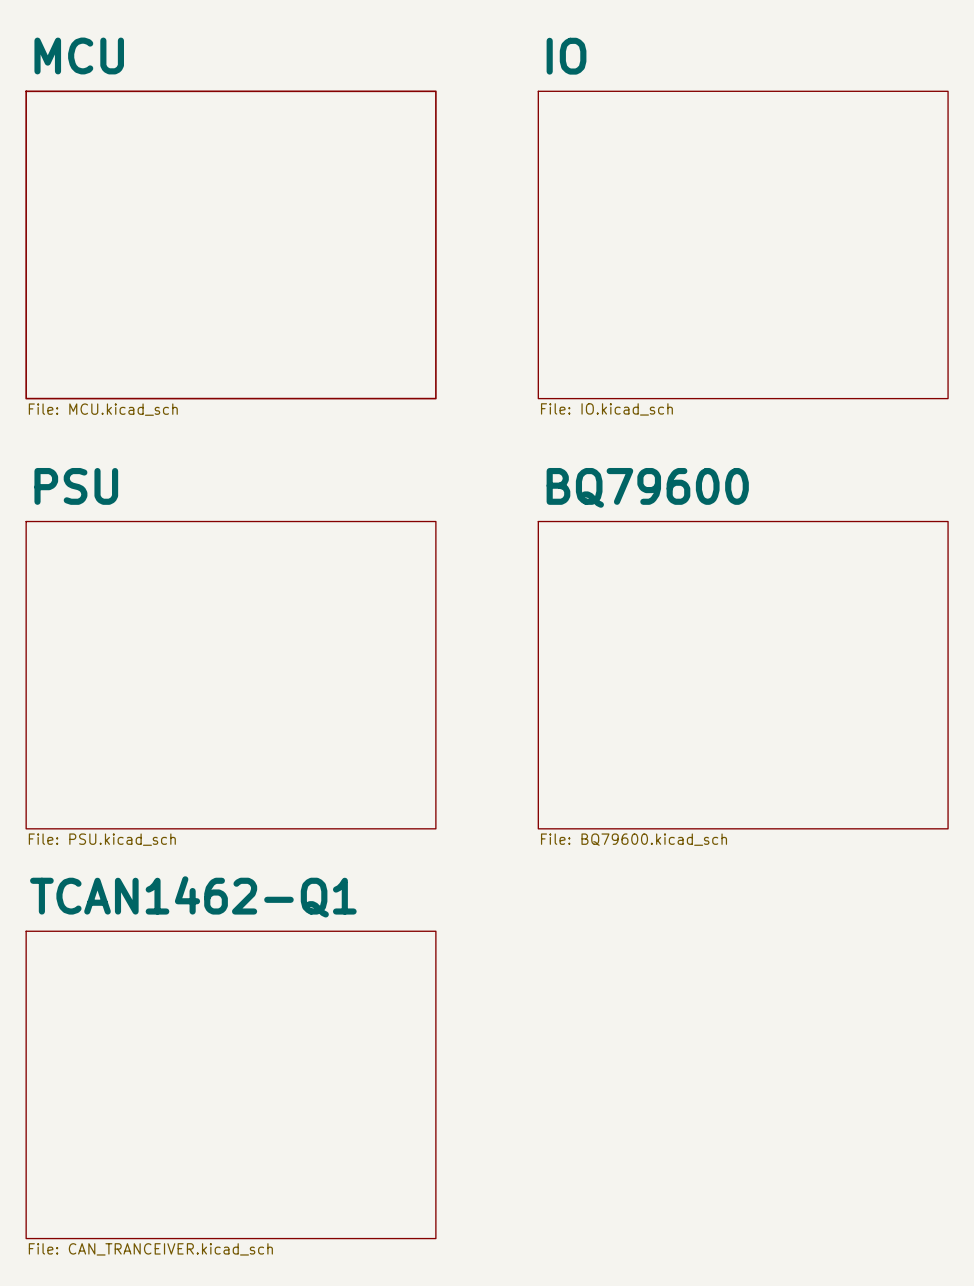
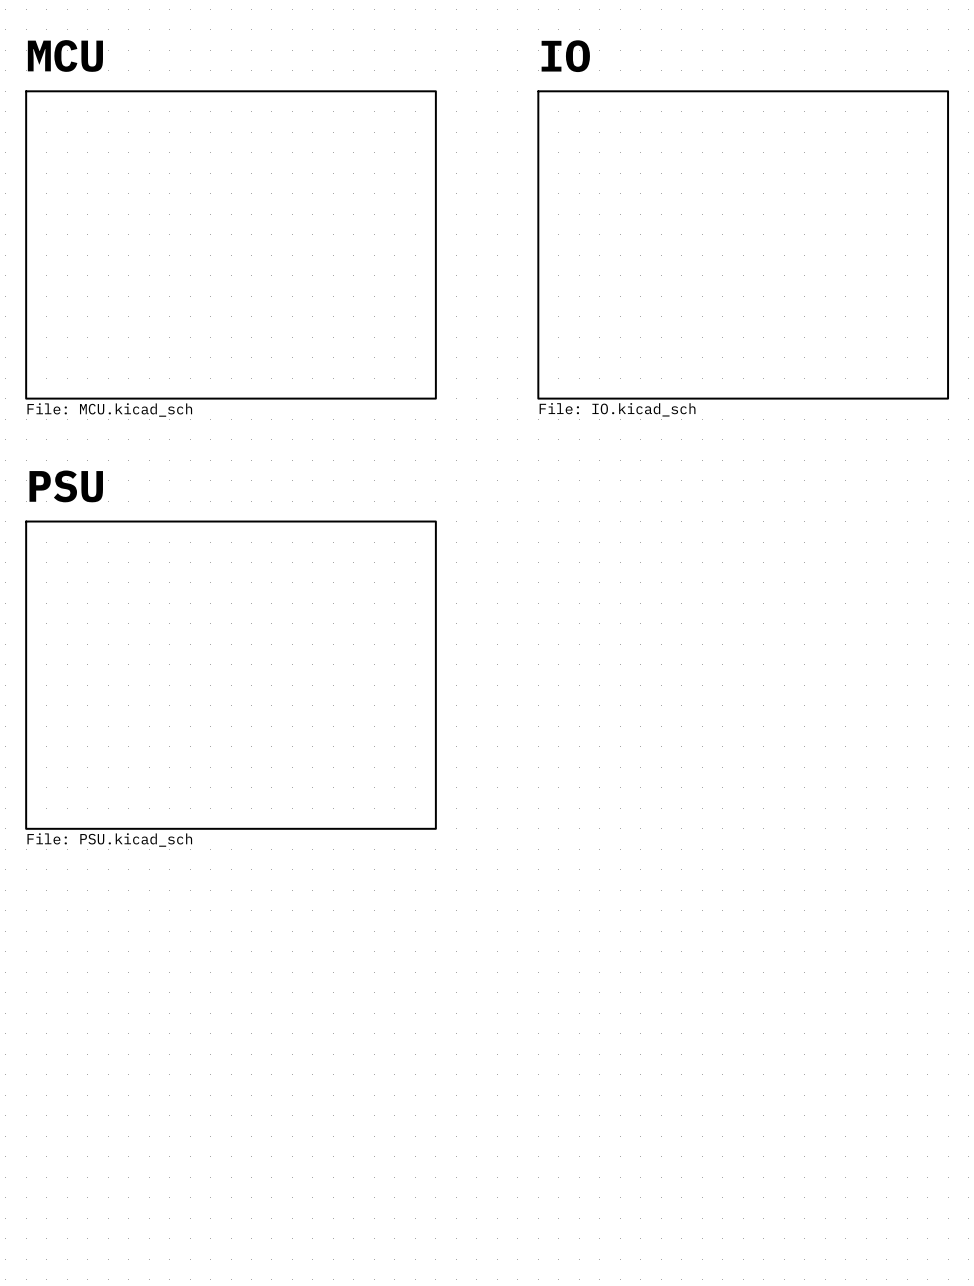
sheet BQ79600: File: BQ79600.kicad_sch (743, 675) -> none
sheet TCAN1462-Q1: File: CAN_TRANCEIVER.kicad_sch (231, 1084) -> none

